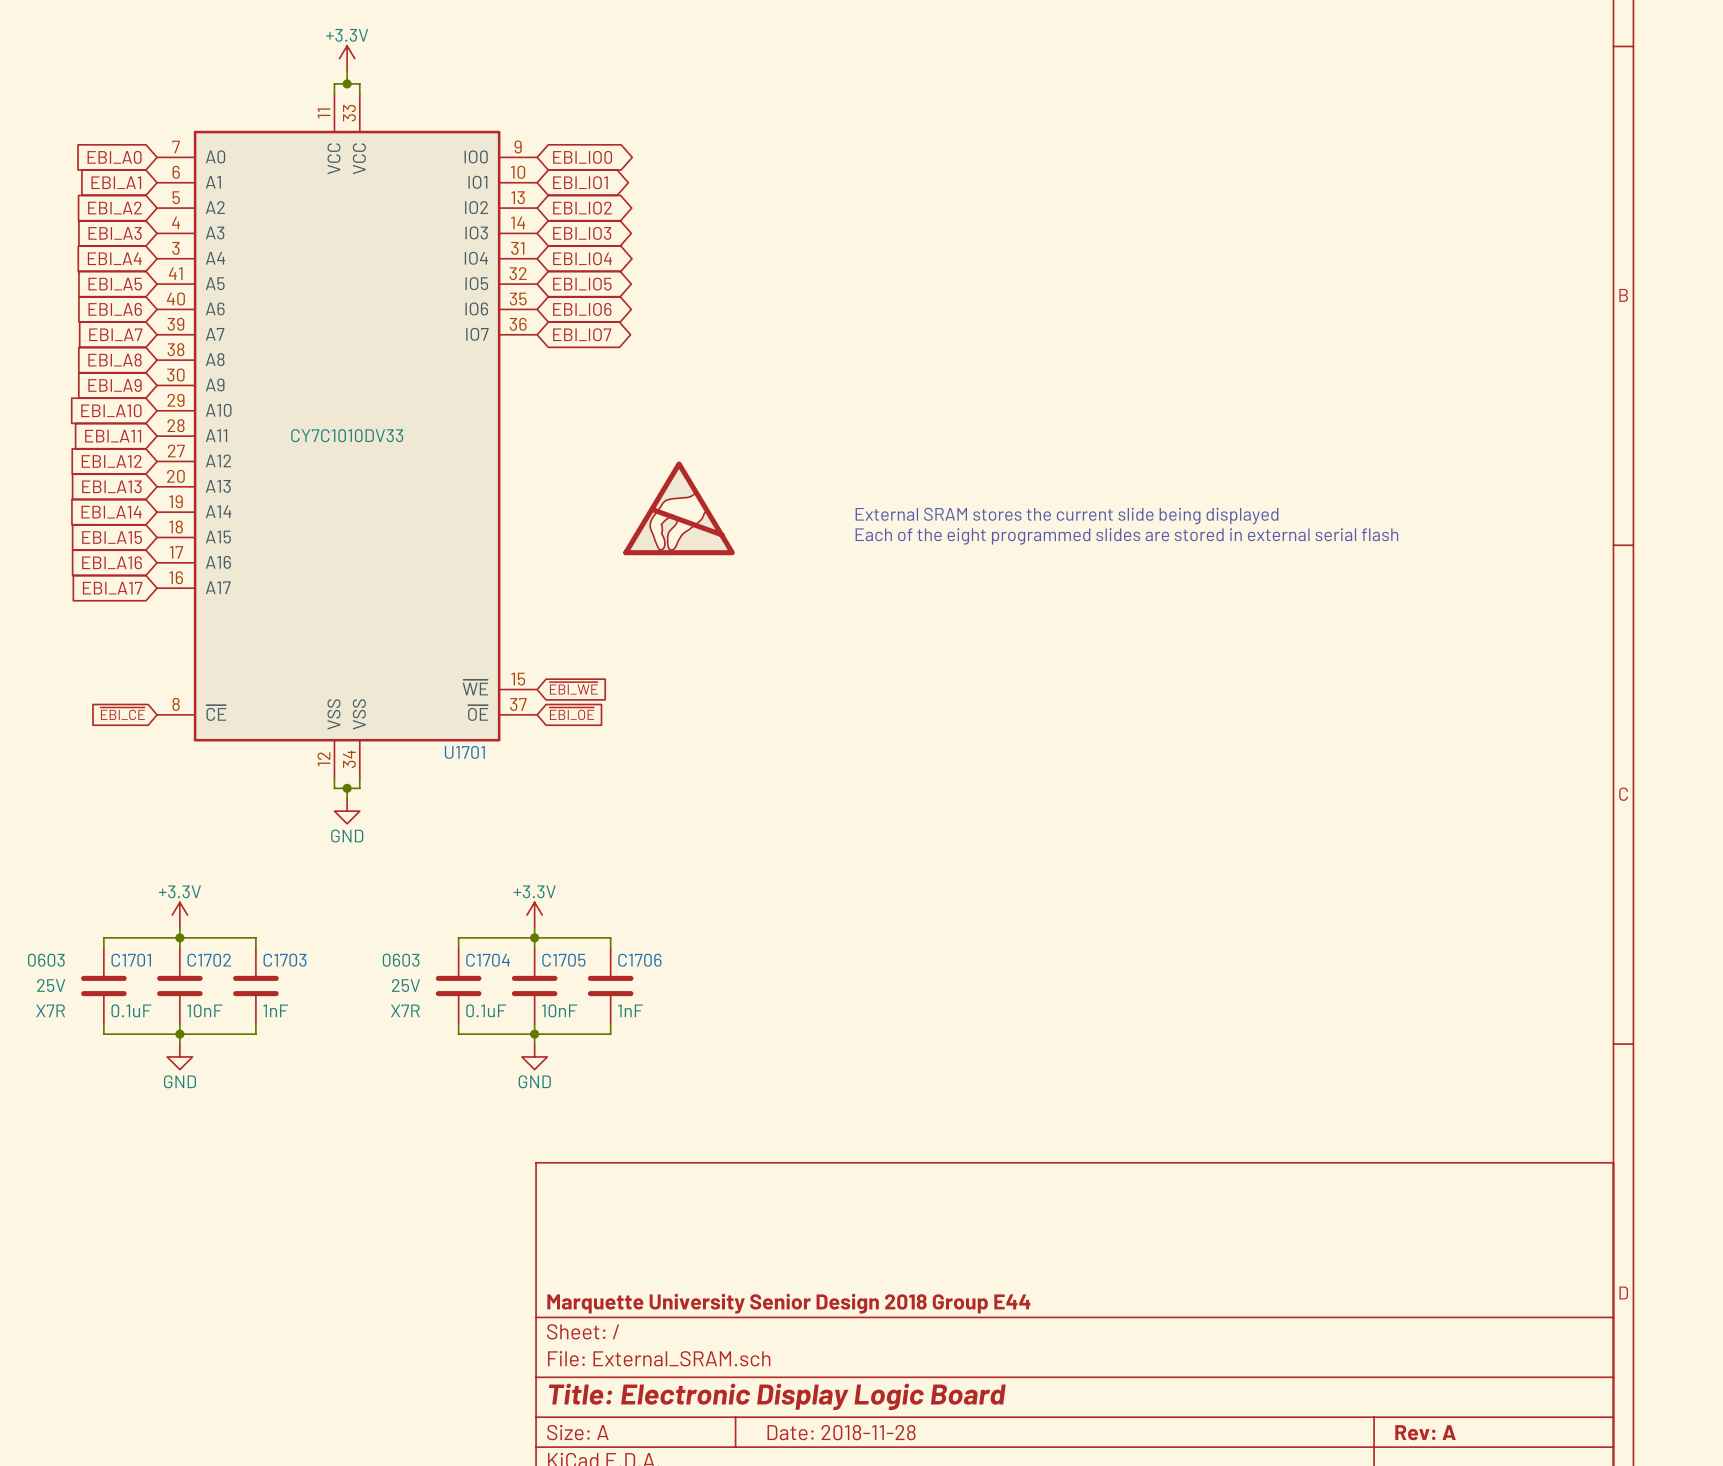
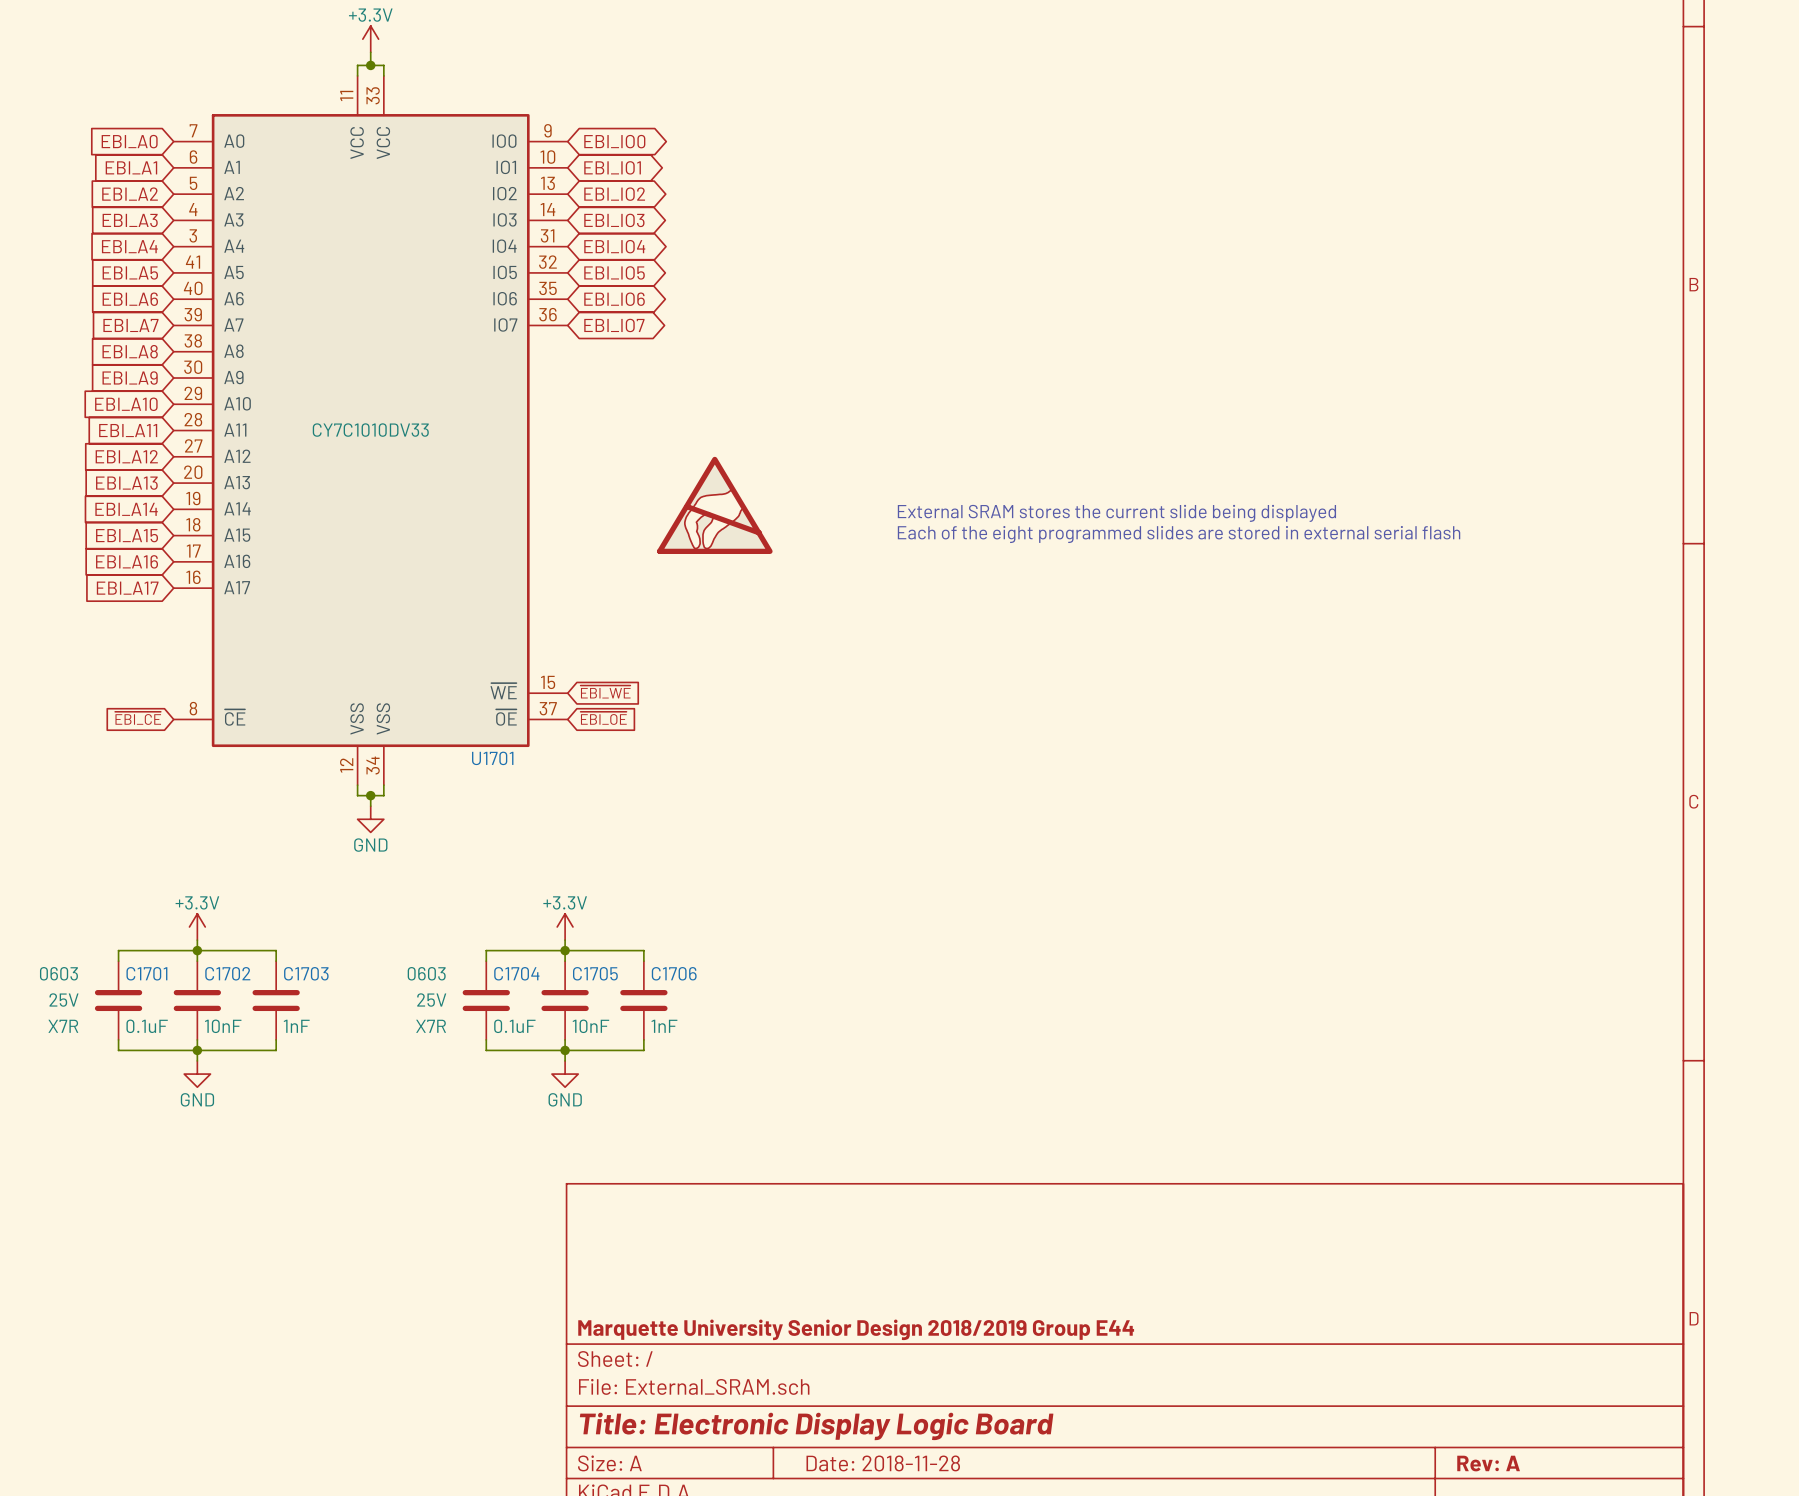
title block: Marquette University Senior Design 2018 Group E44 (788, 1303) -> Marquette University Senior Design 2018/2019 Group E44 (856, 1329)

